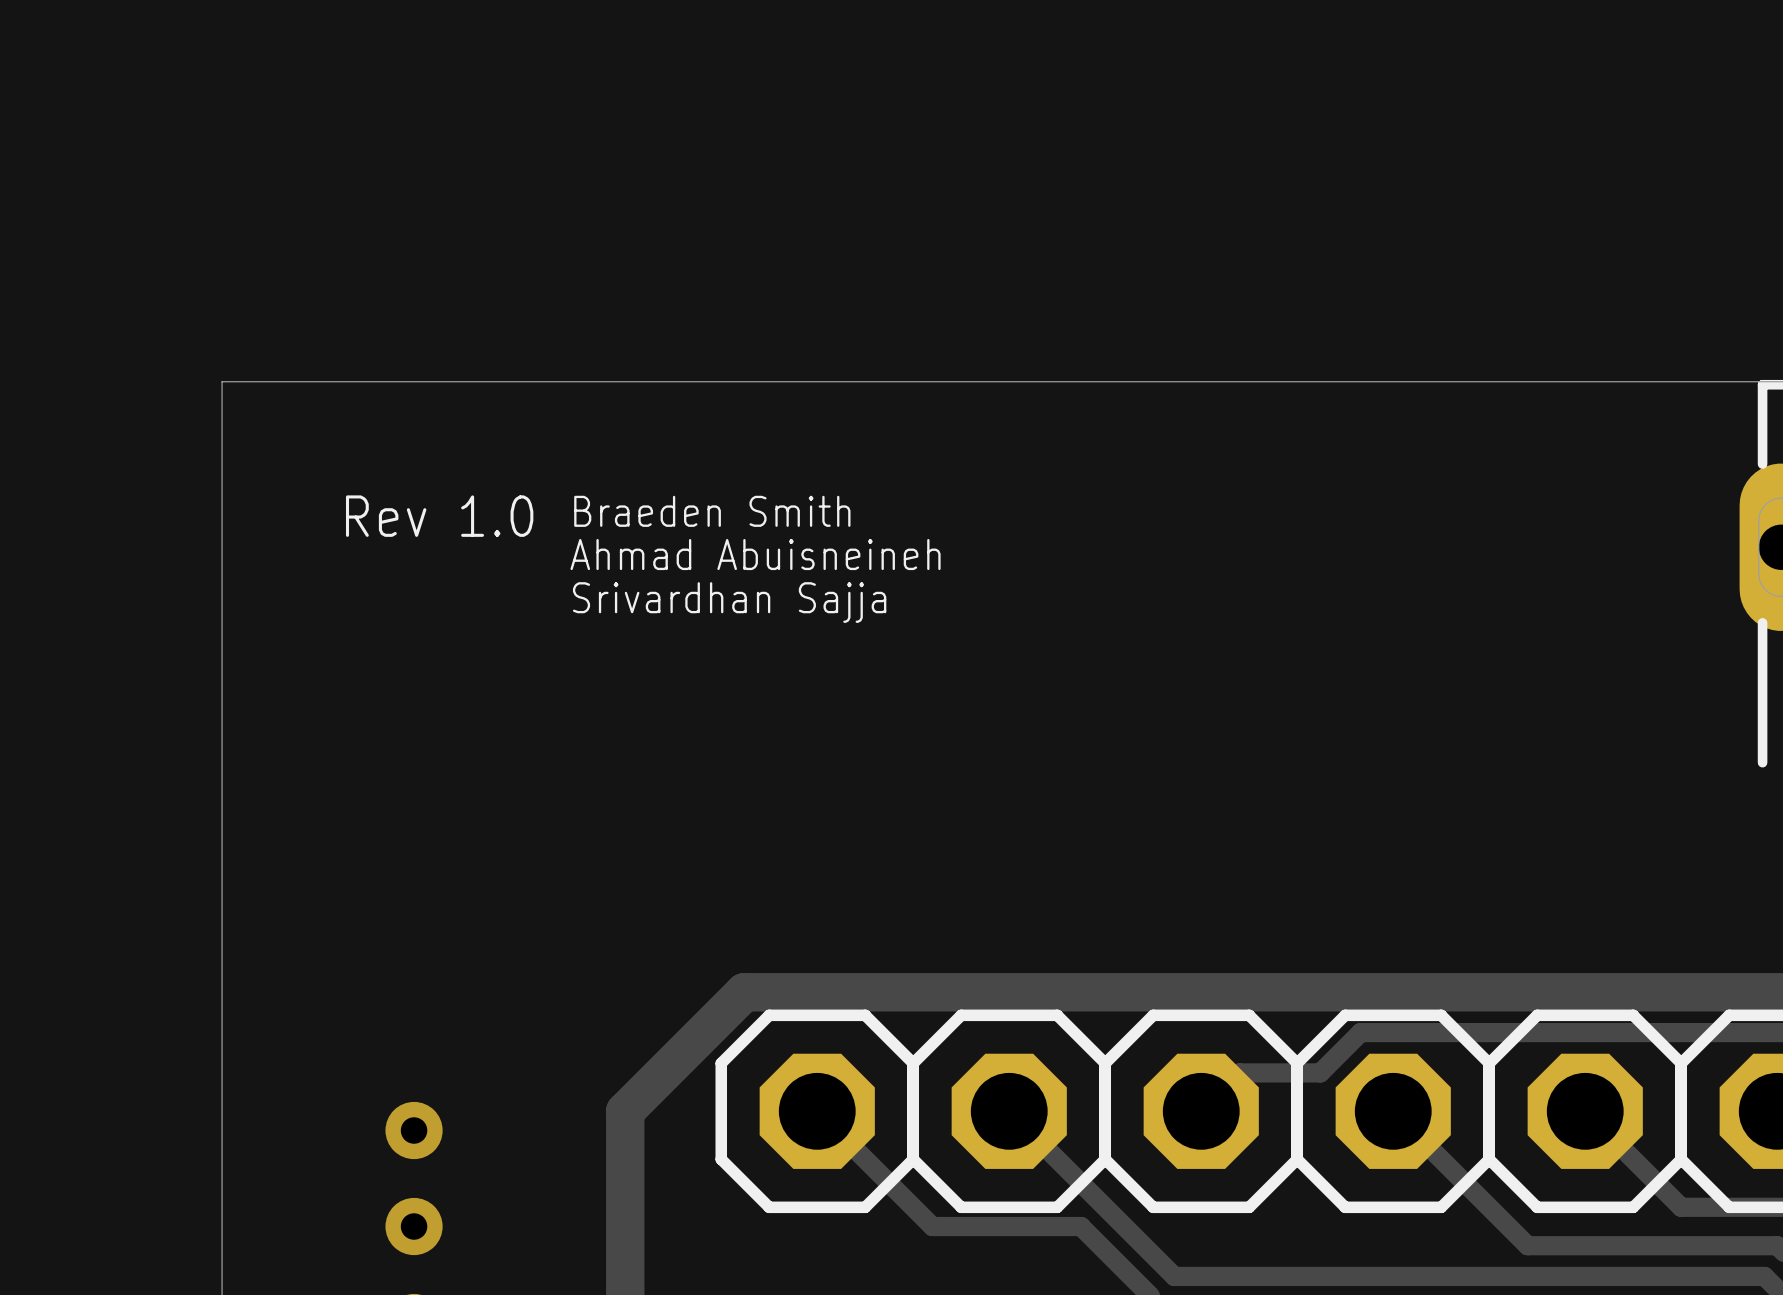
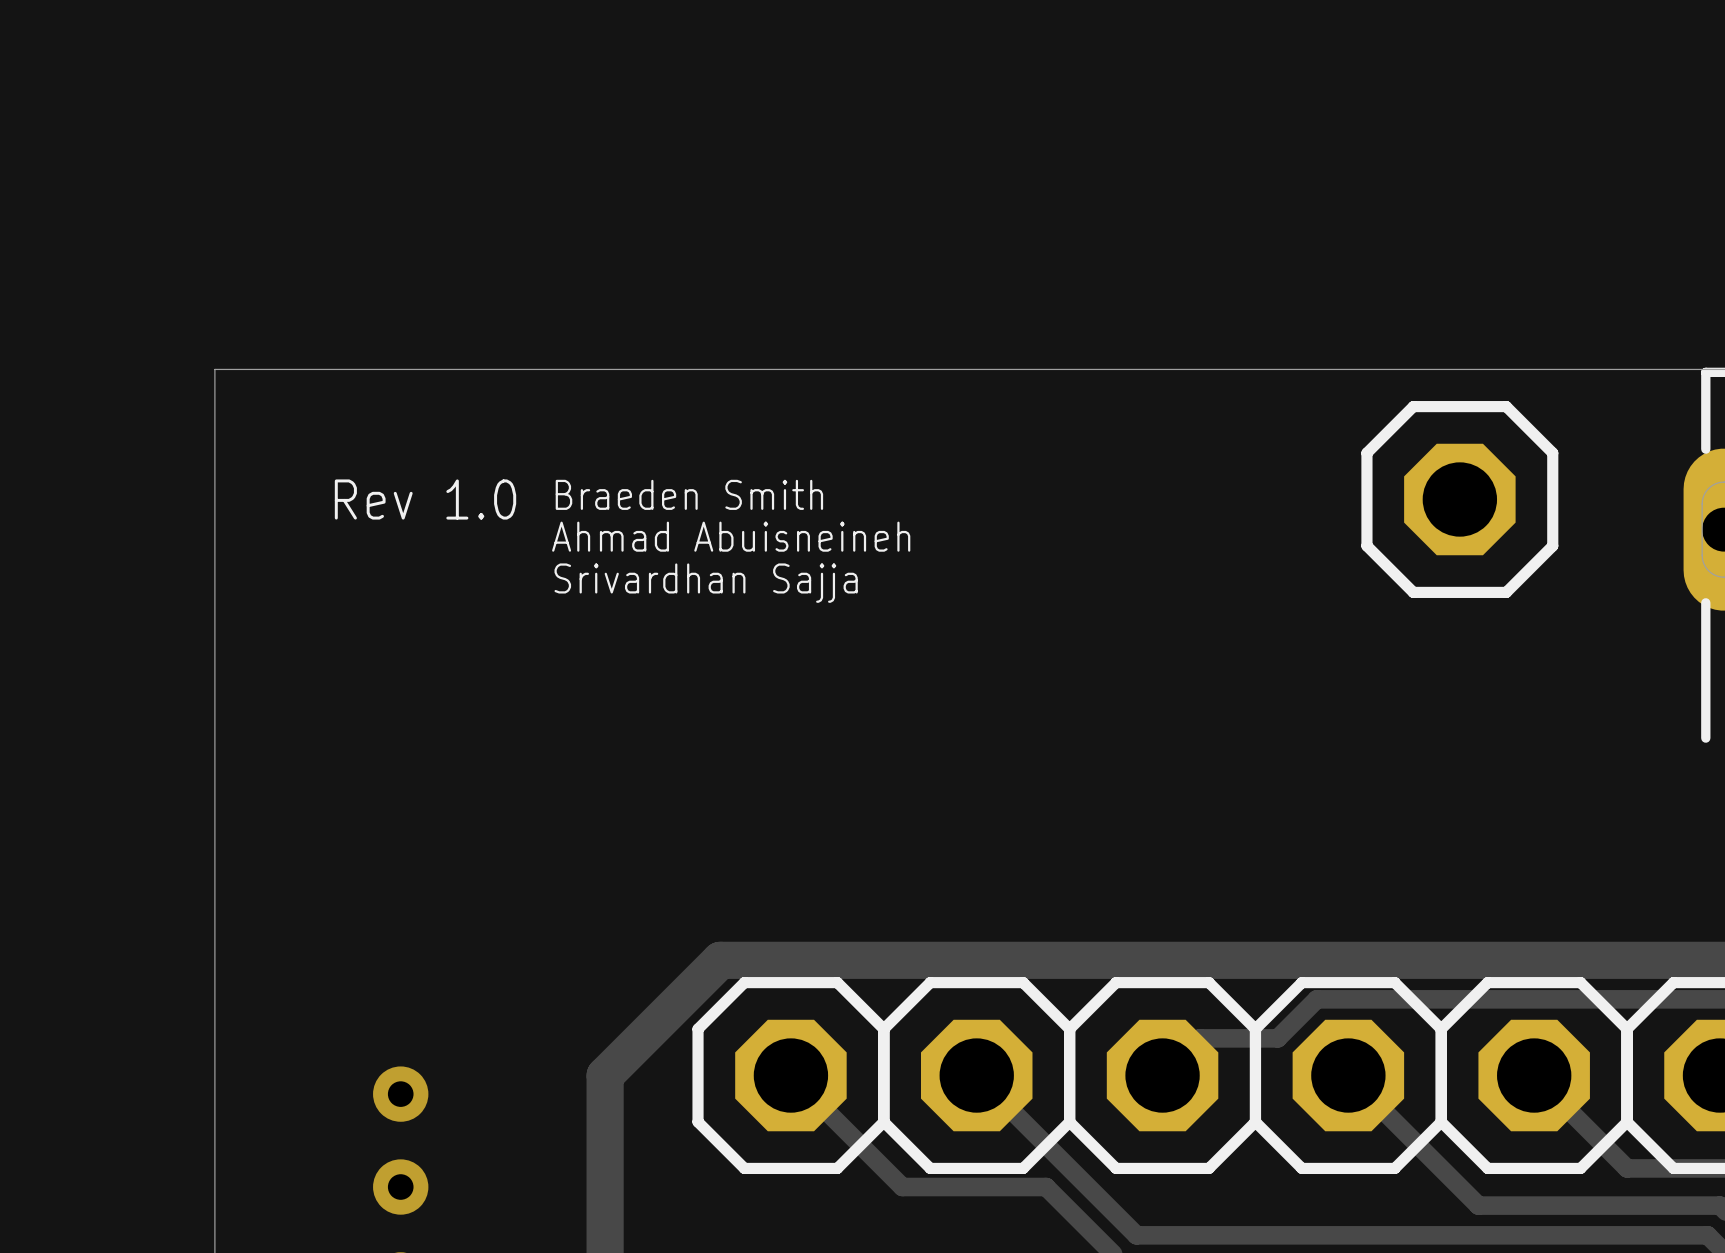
part: none -> (1459, 499)

